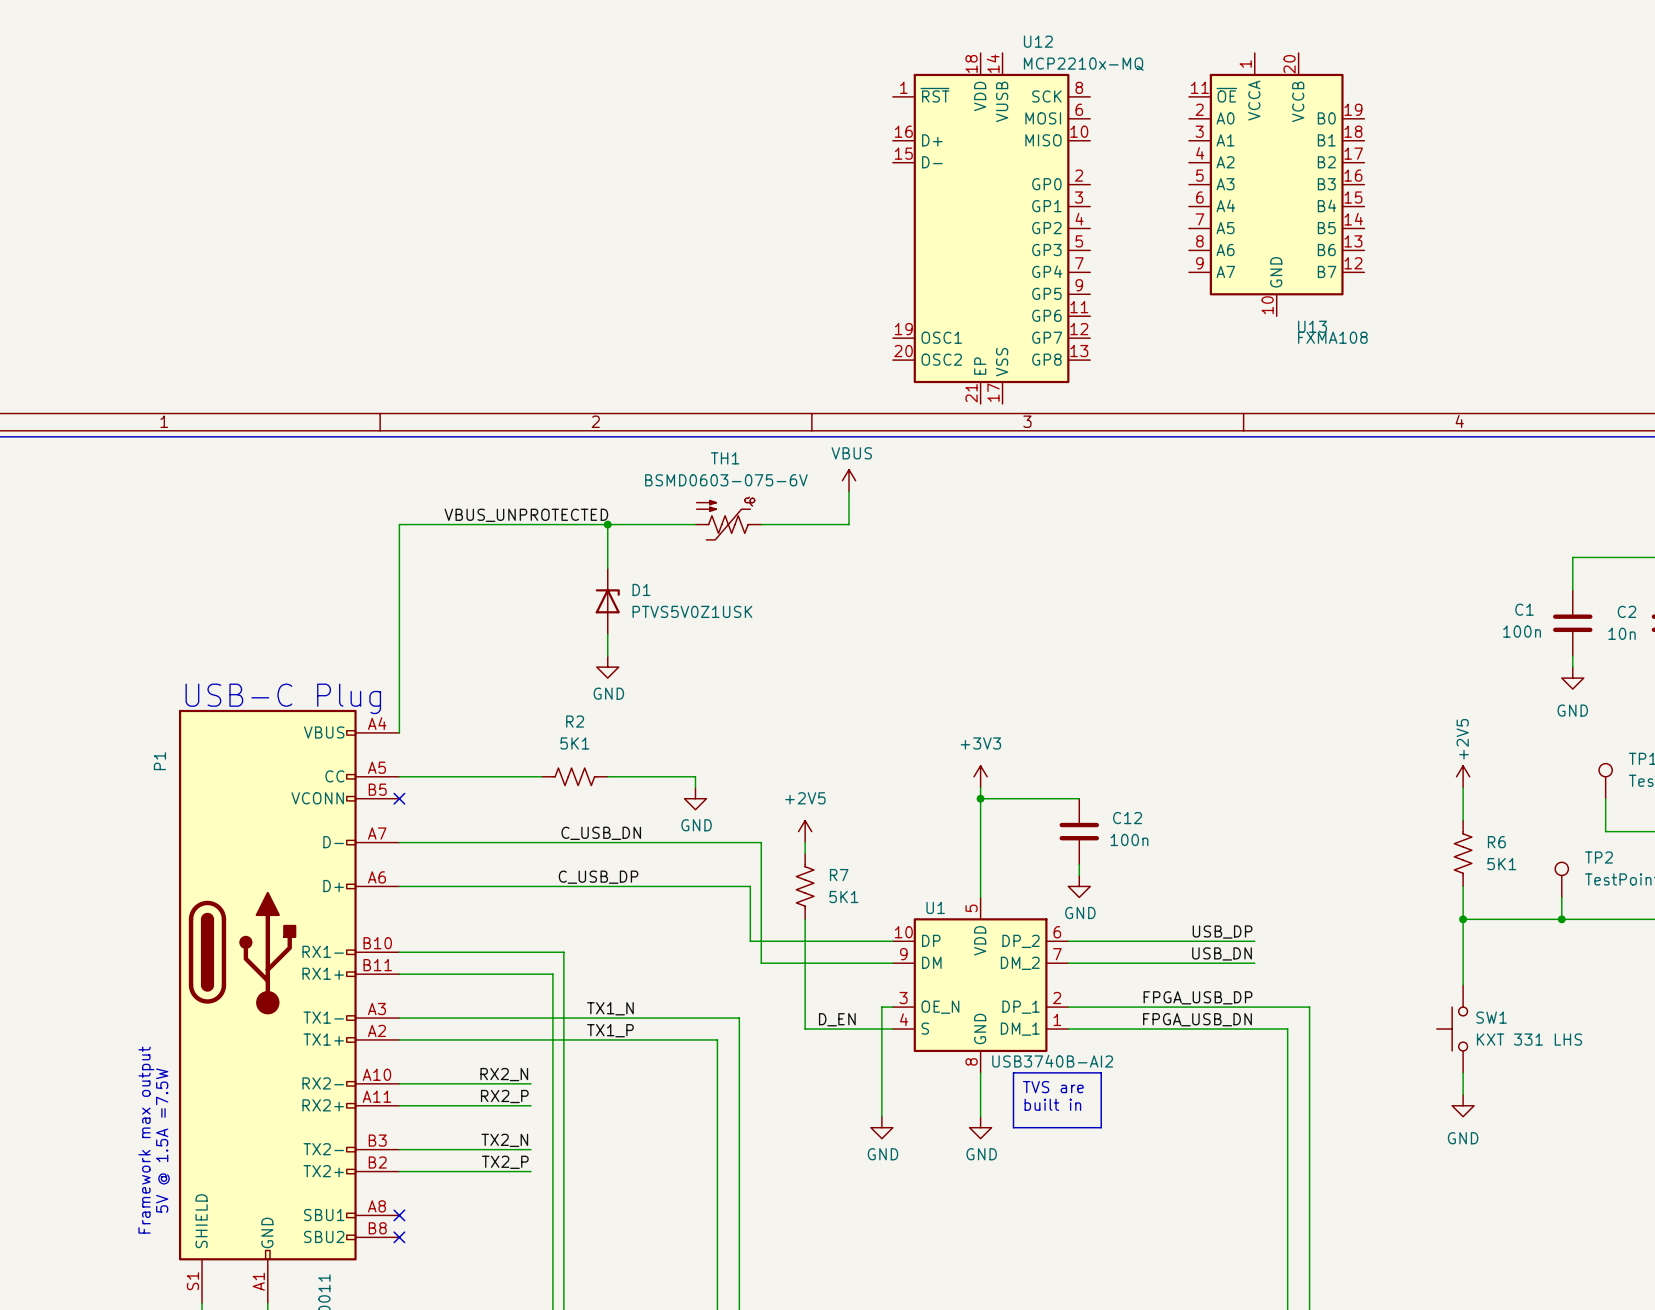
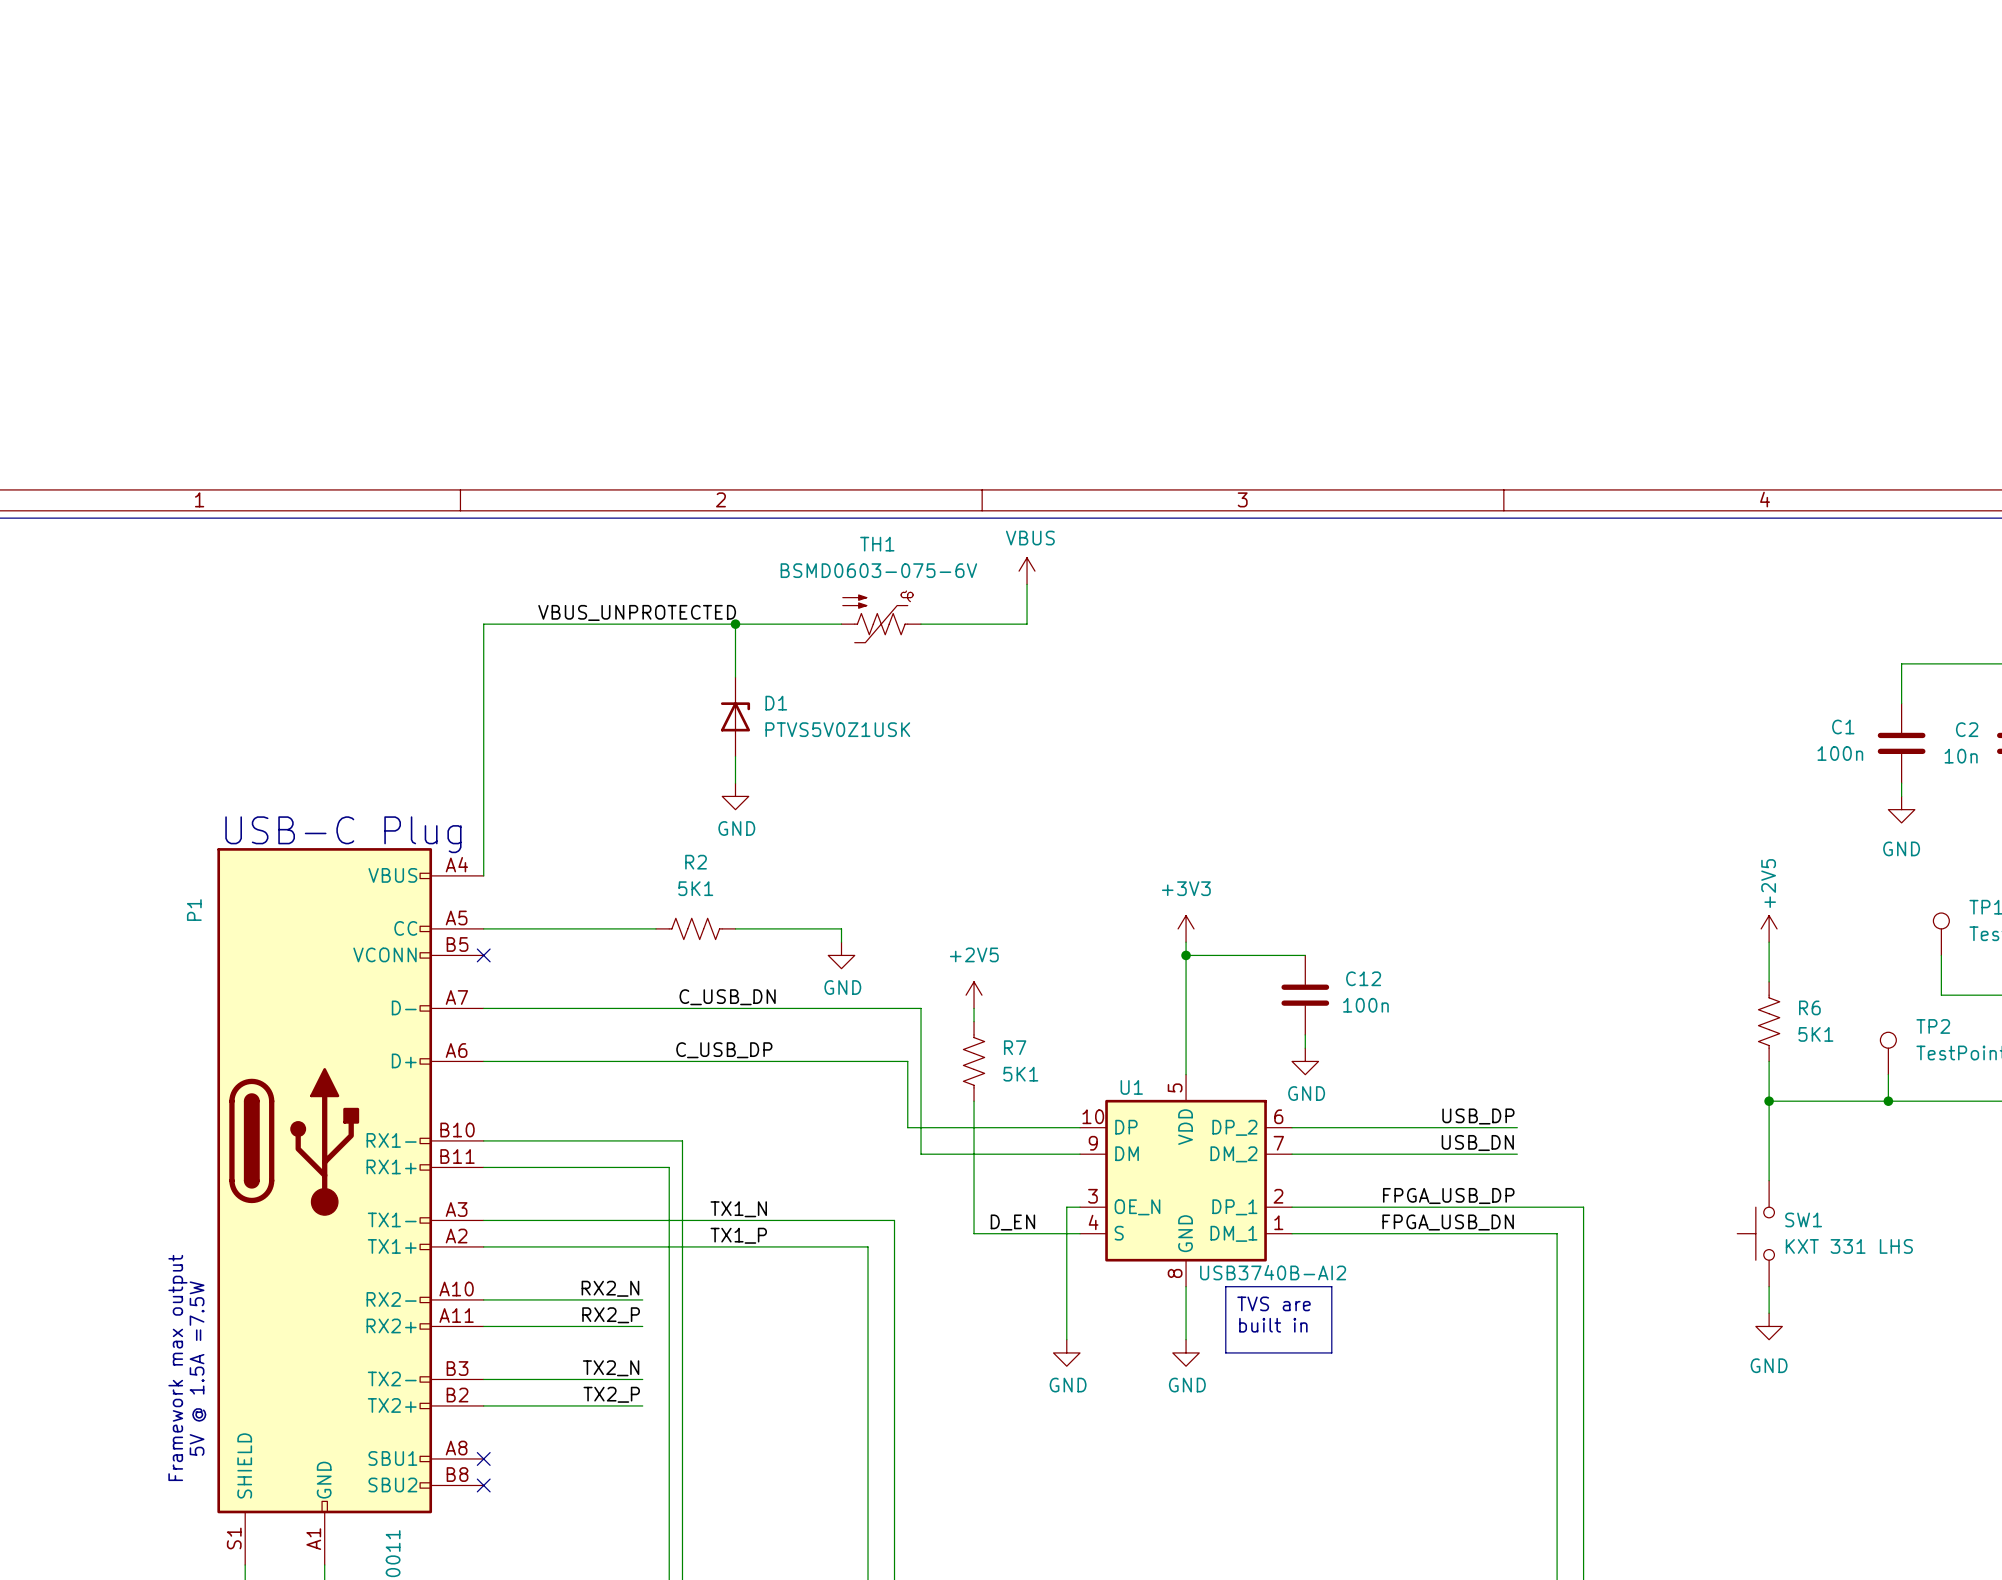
U13: FXMA108 (1276, 184) -> none
U12: MCP2210x-MQ (991, 228) -> none

